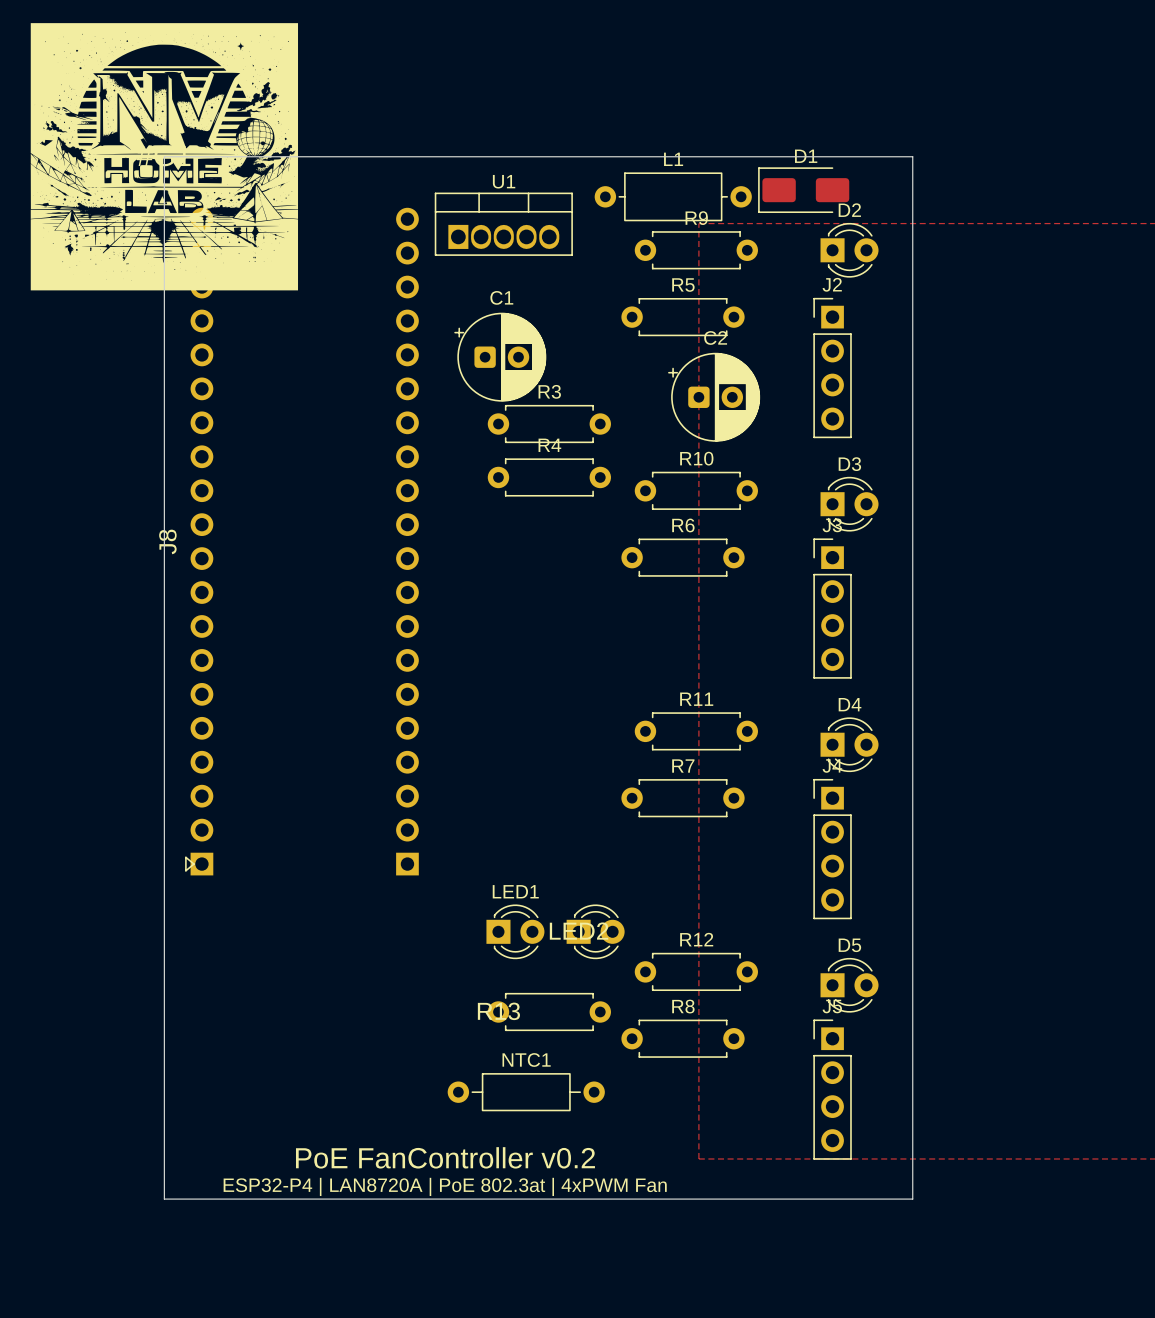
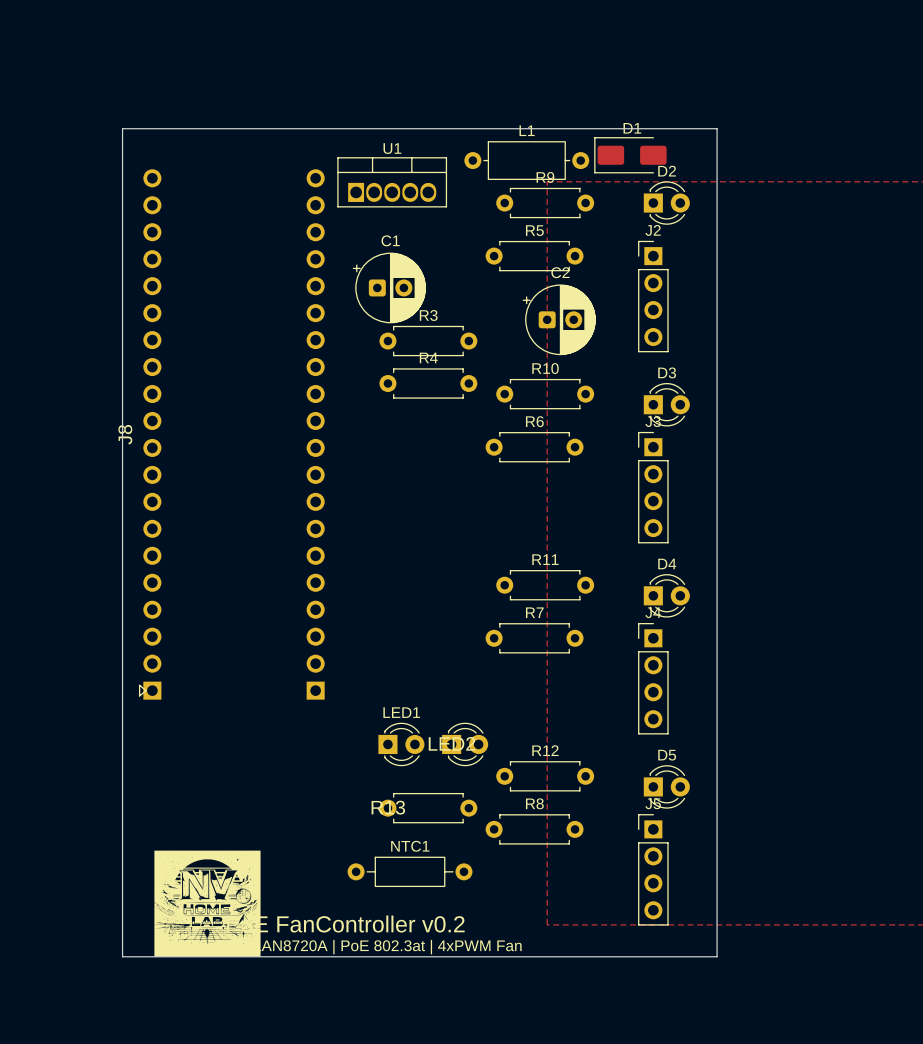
part: (164, 156) -> none
drawing: none -> [154, 850, 261, 957]

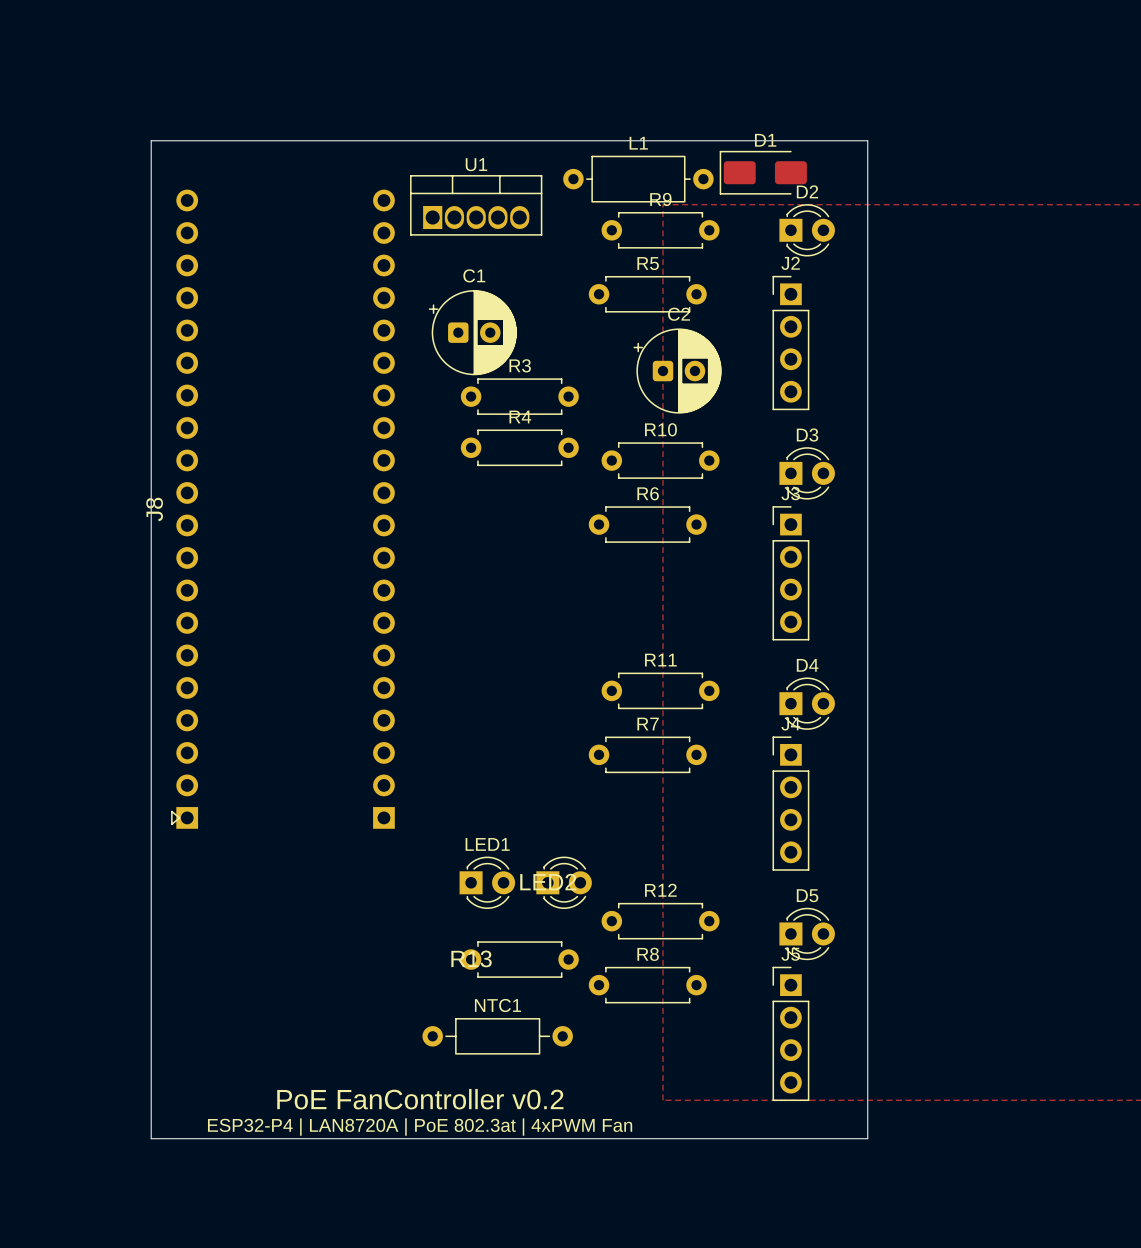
drawing: [154, 850, 261, 957] -> none

